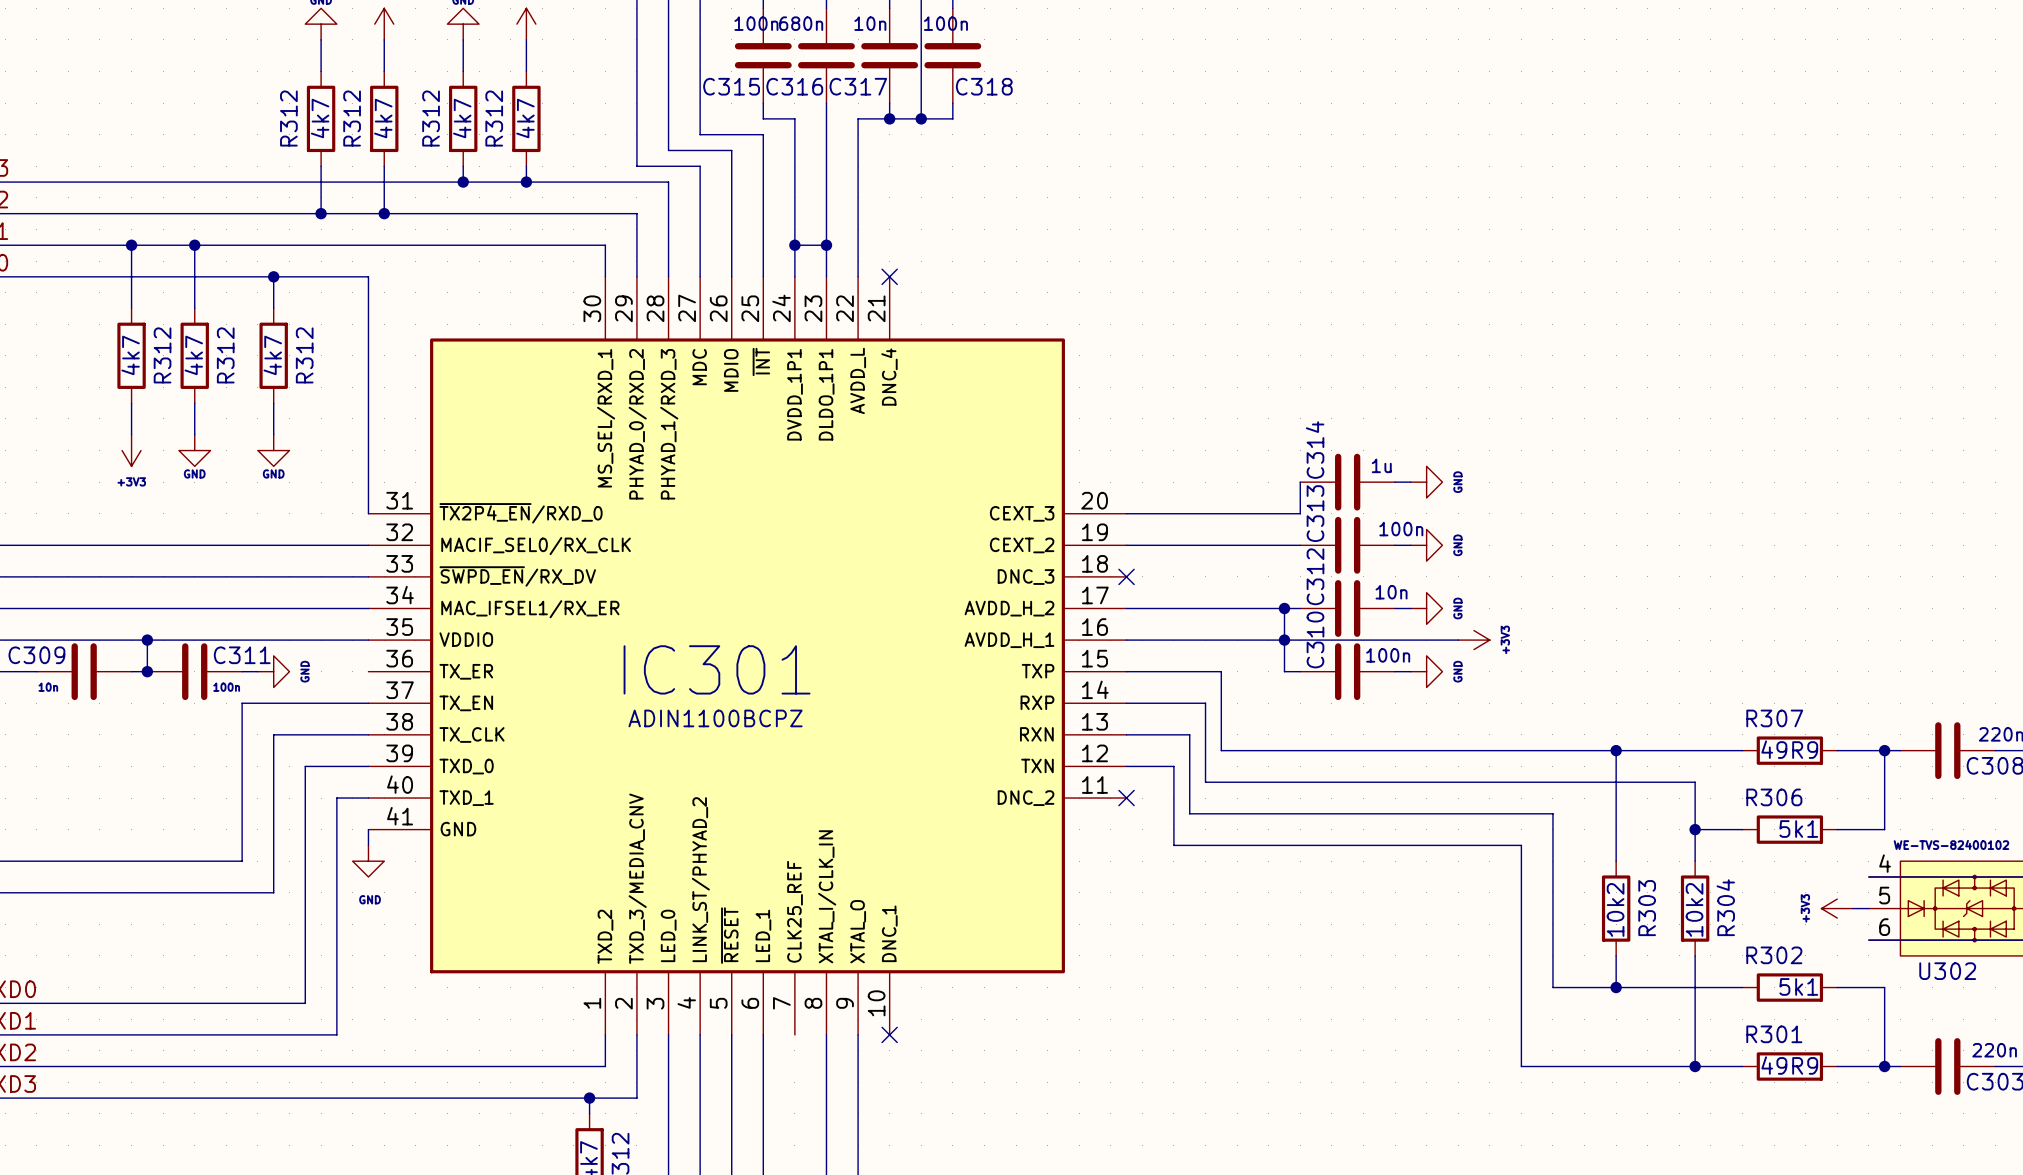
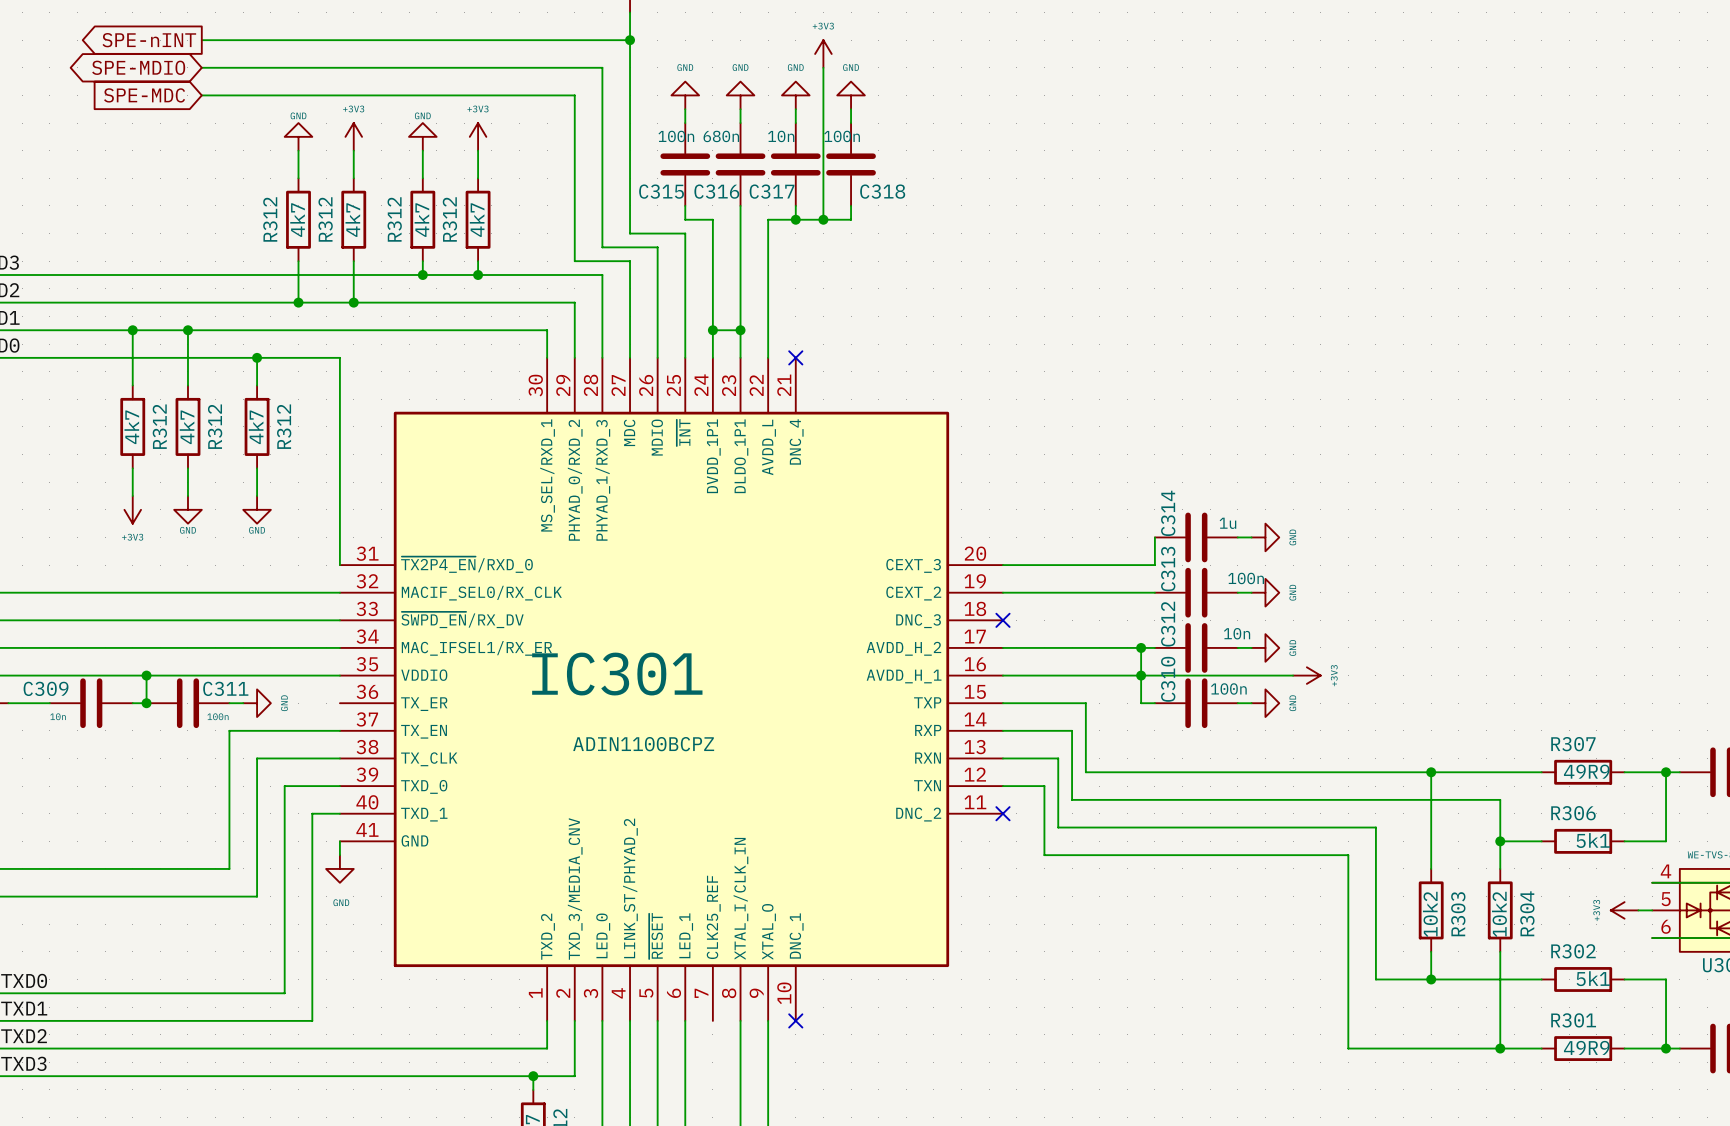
IC301 name position: IC301 (717, 669) -> IC301 (617, 674)

